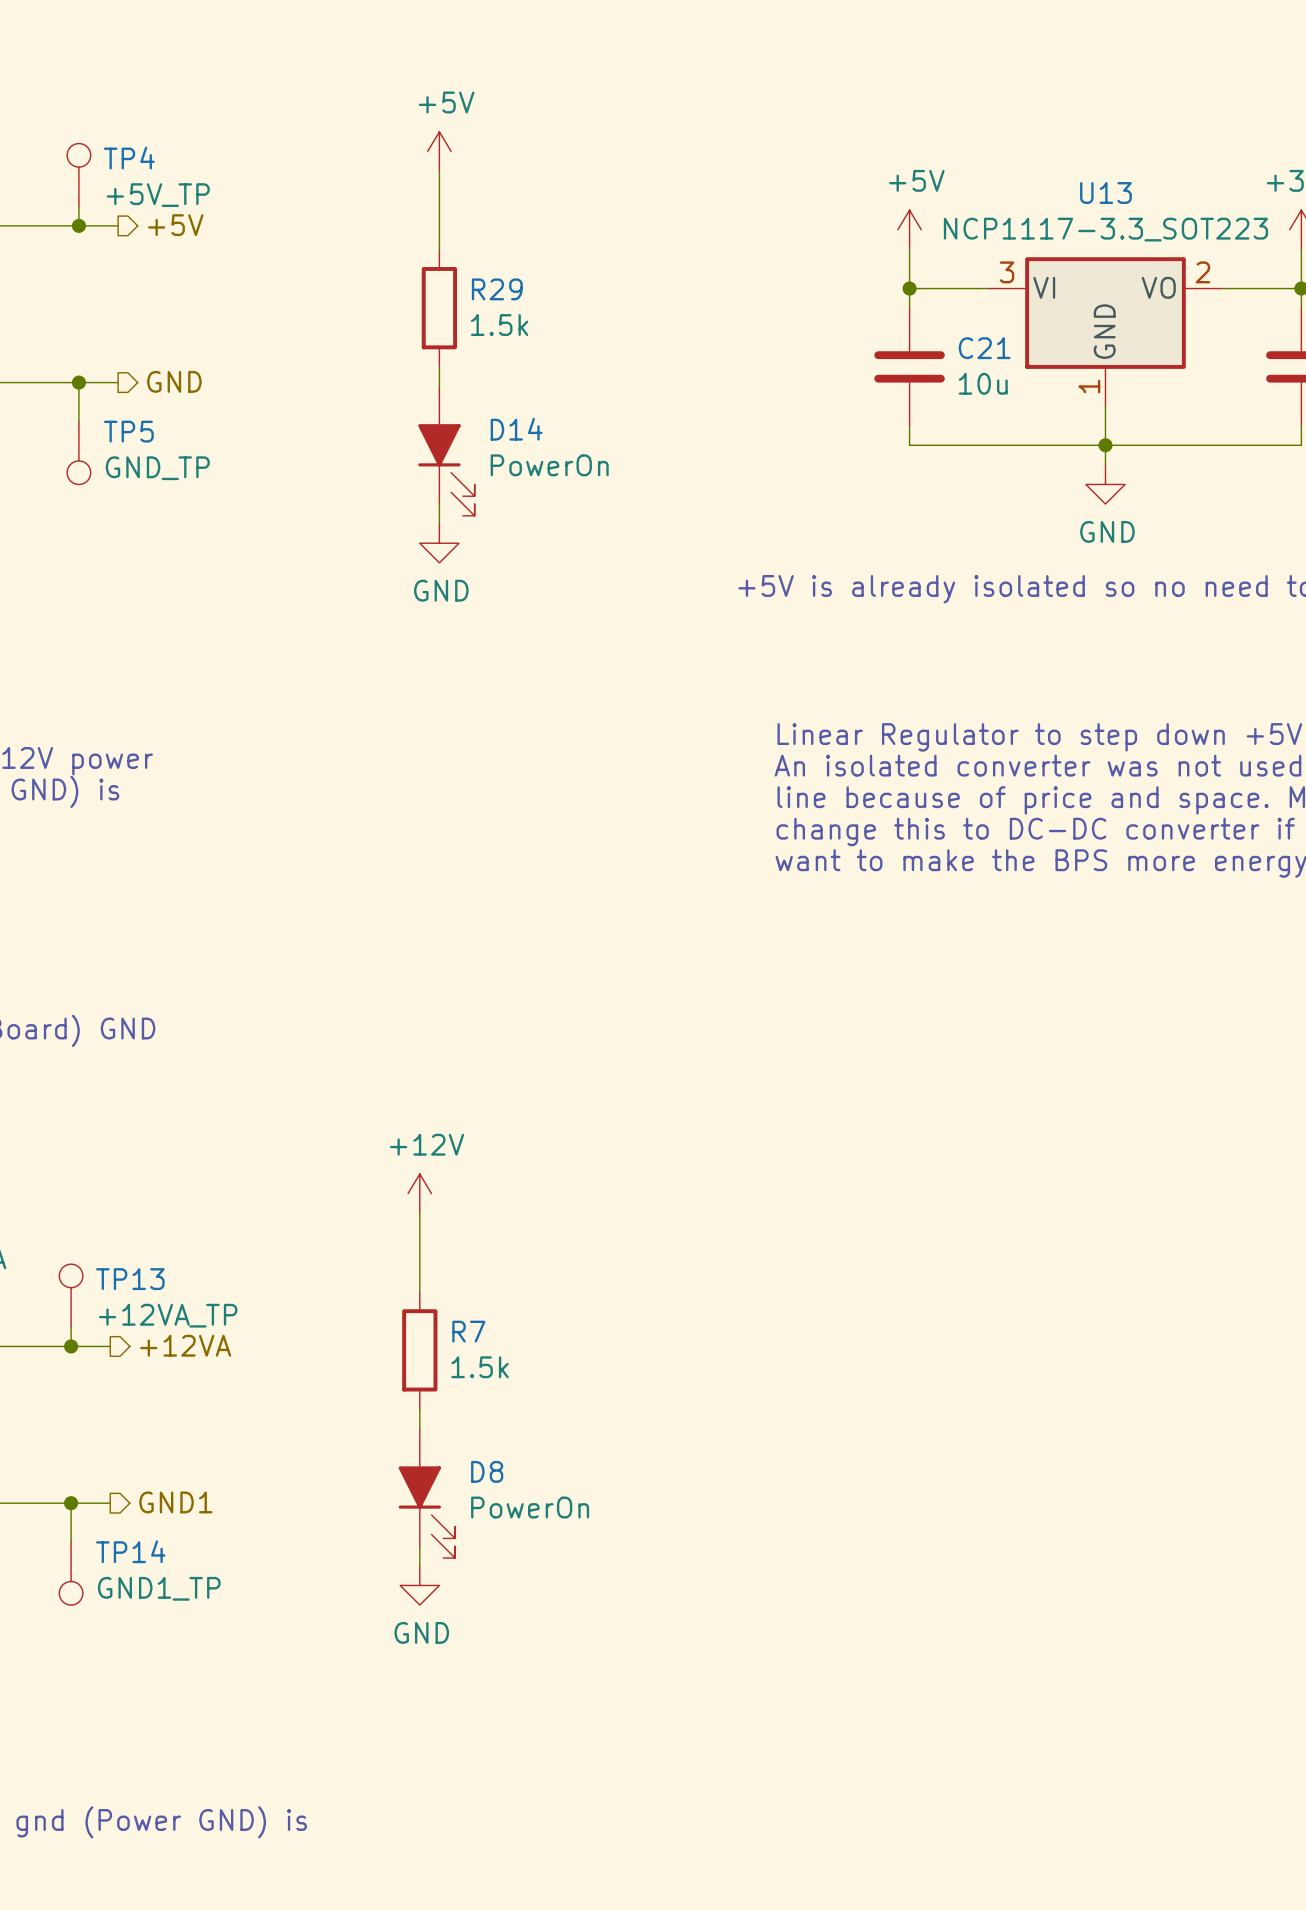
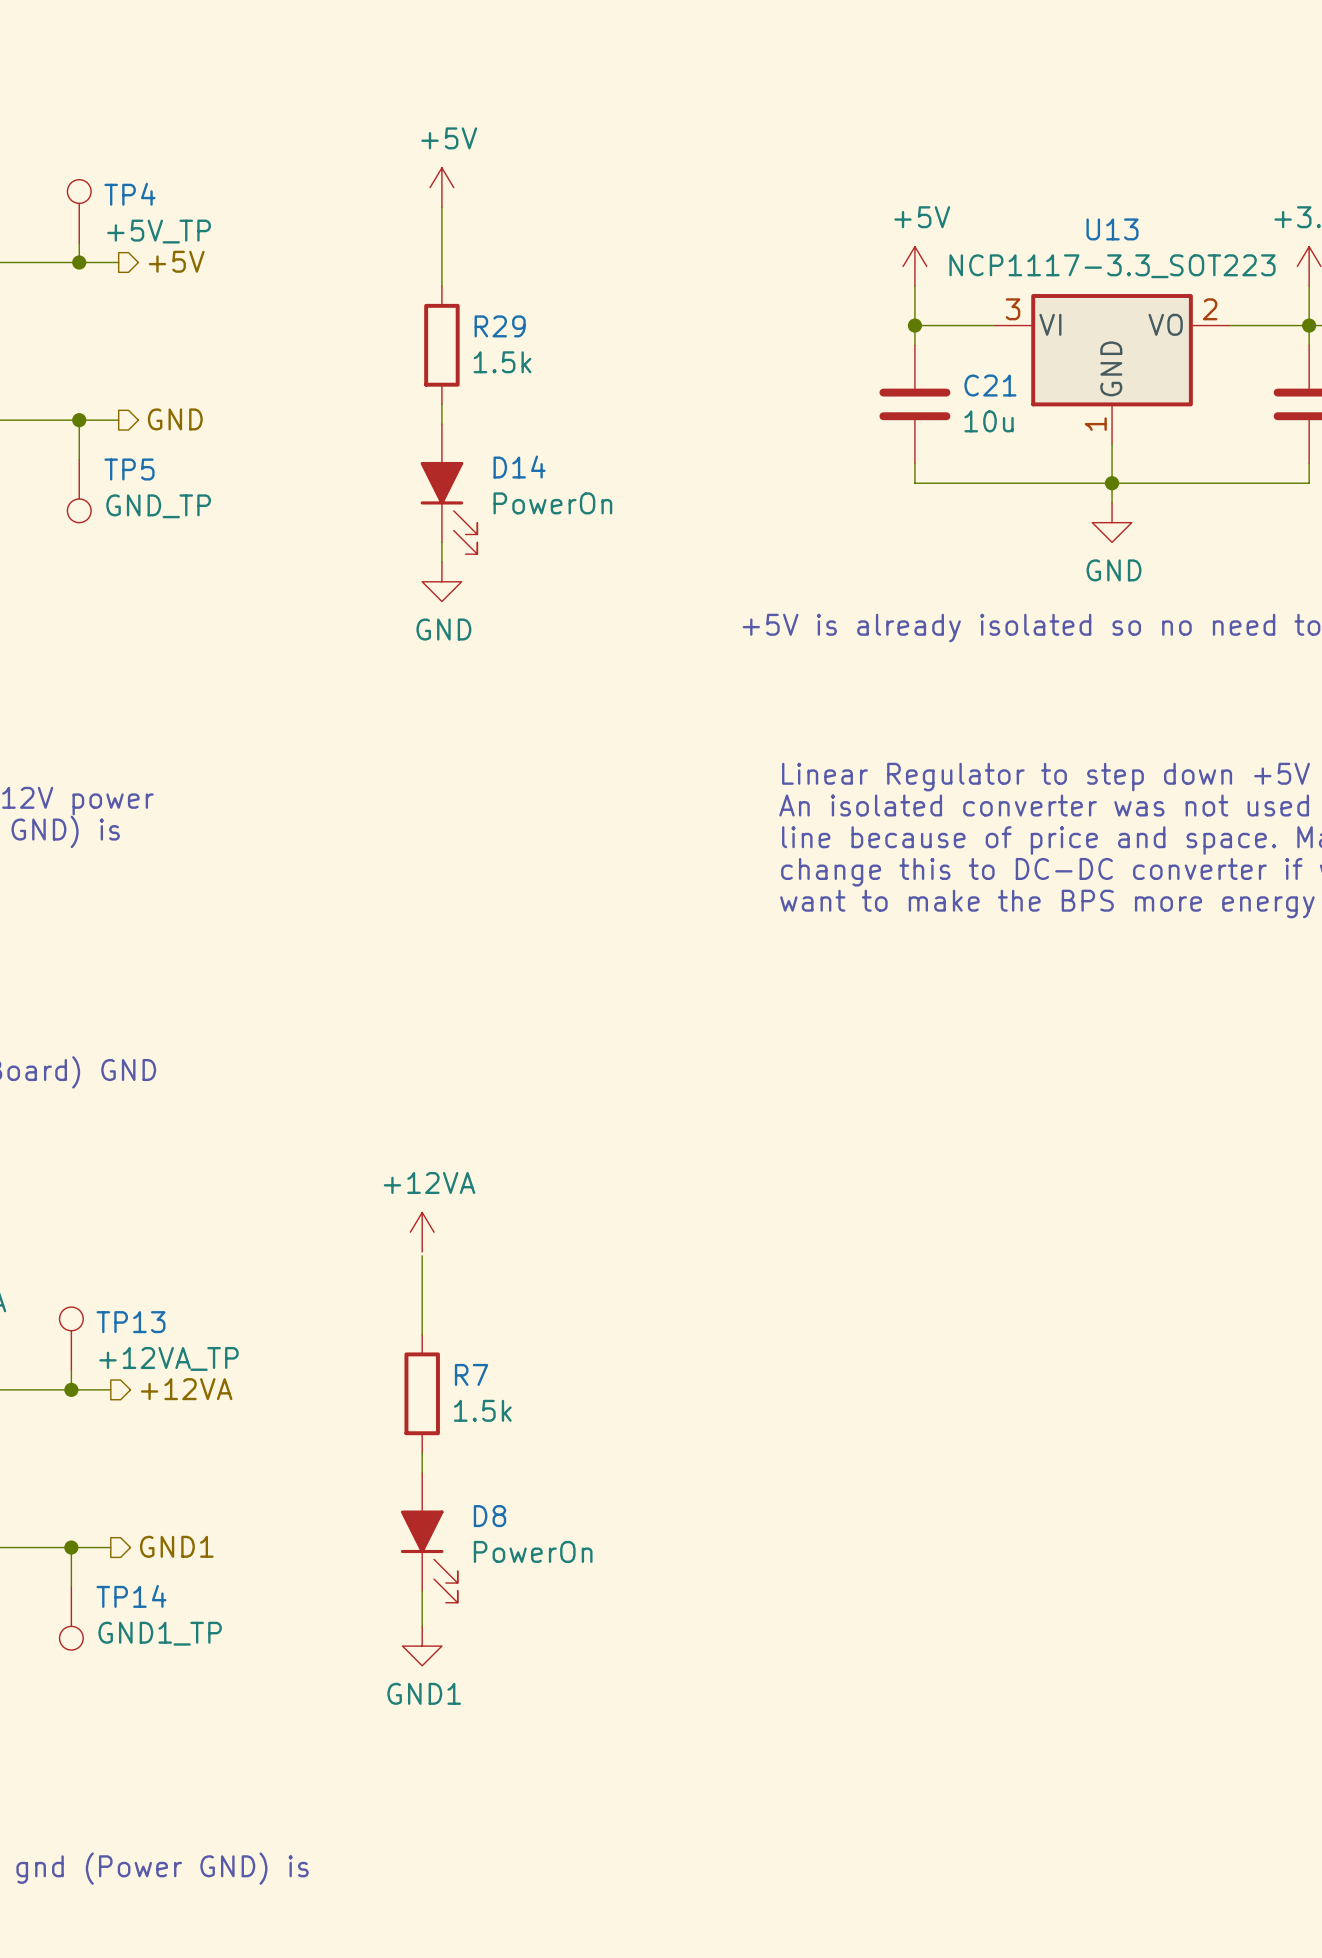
power symbol: +12V (419, 1193) -> +12VA (422, 1232)
power symbol: GND (419, 1585) -> none
power symbol: none -> GND1 (422, 1646)

